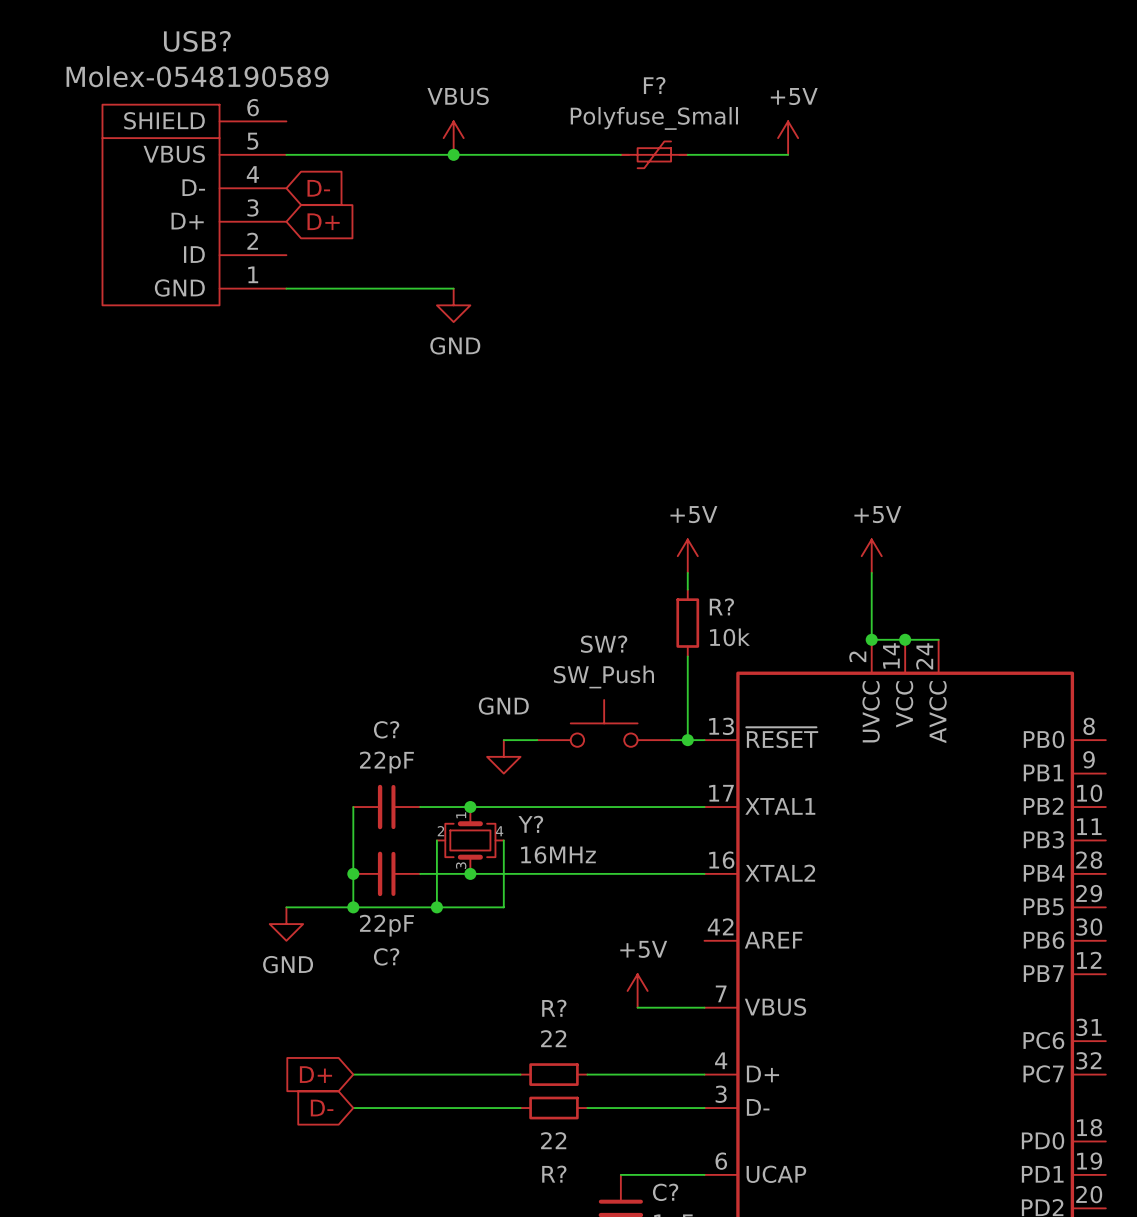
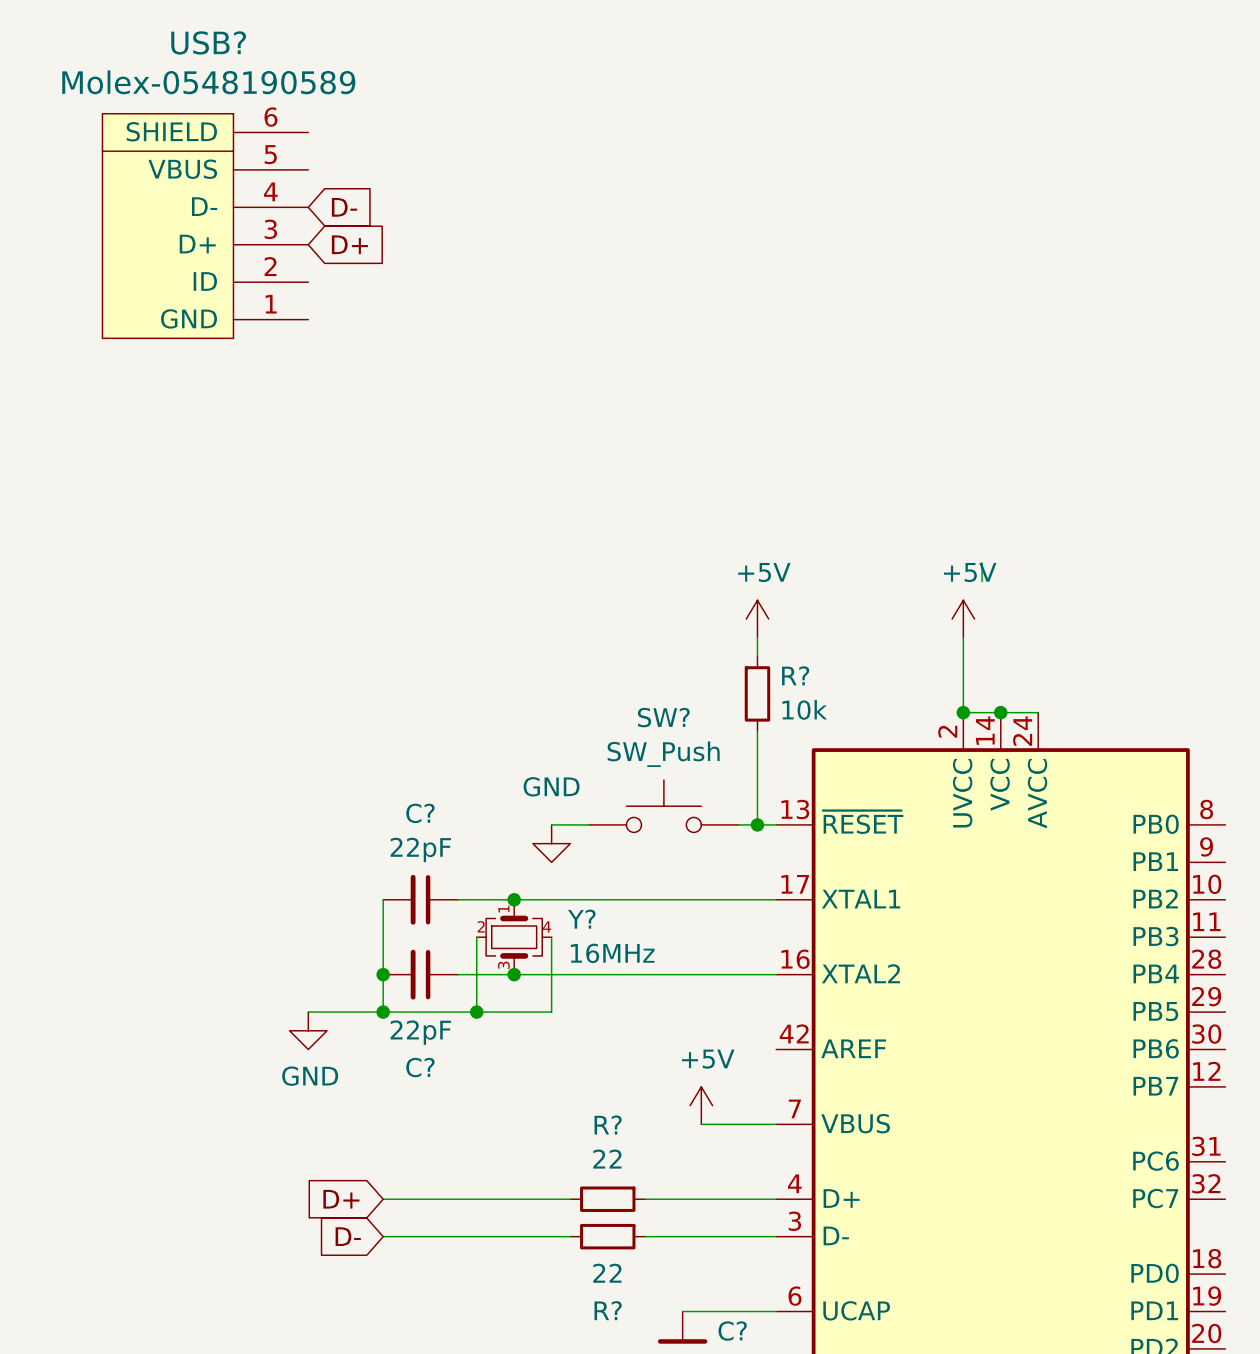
power symbol: VBUS (453, 138) -> none
power symbol: +5V (788, 138) -> none
wire: (286, 154) (620, 154) -> none
junction: (453, 154) -> none
F?: Polyfuse_Small (654, 154) -> none
wire: (687, 154) (788, 154) -> none
wire: (286, 288) (453, 288) -> none
power symbol: GND (453, 305) -> none
wire: none -> (982, 562) (982, 581)

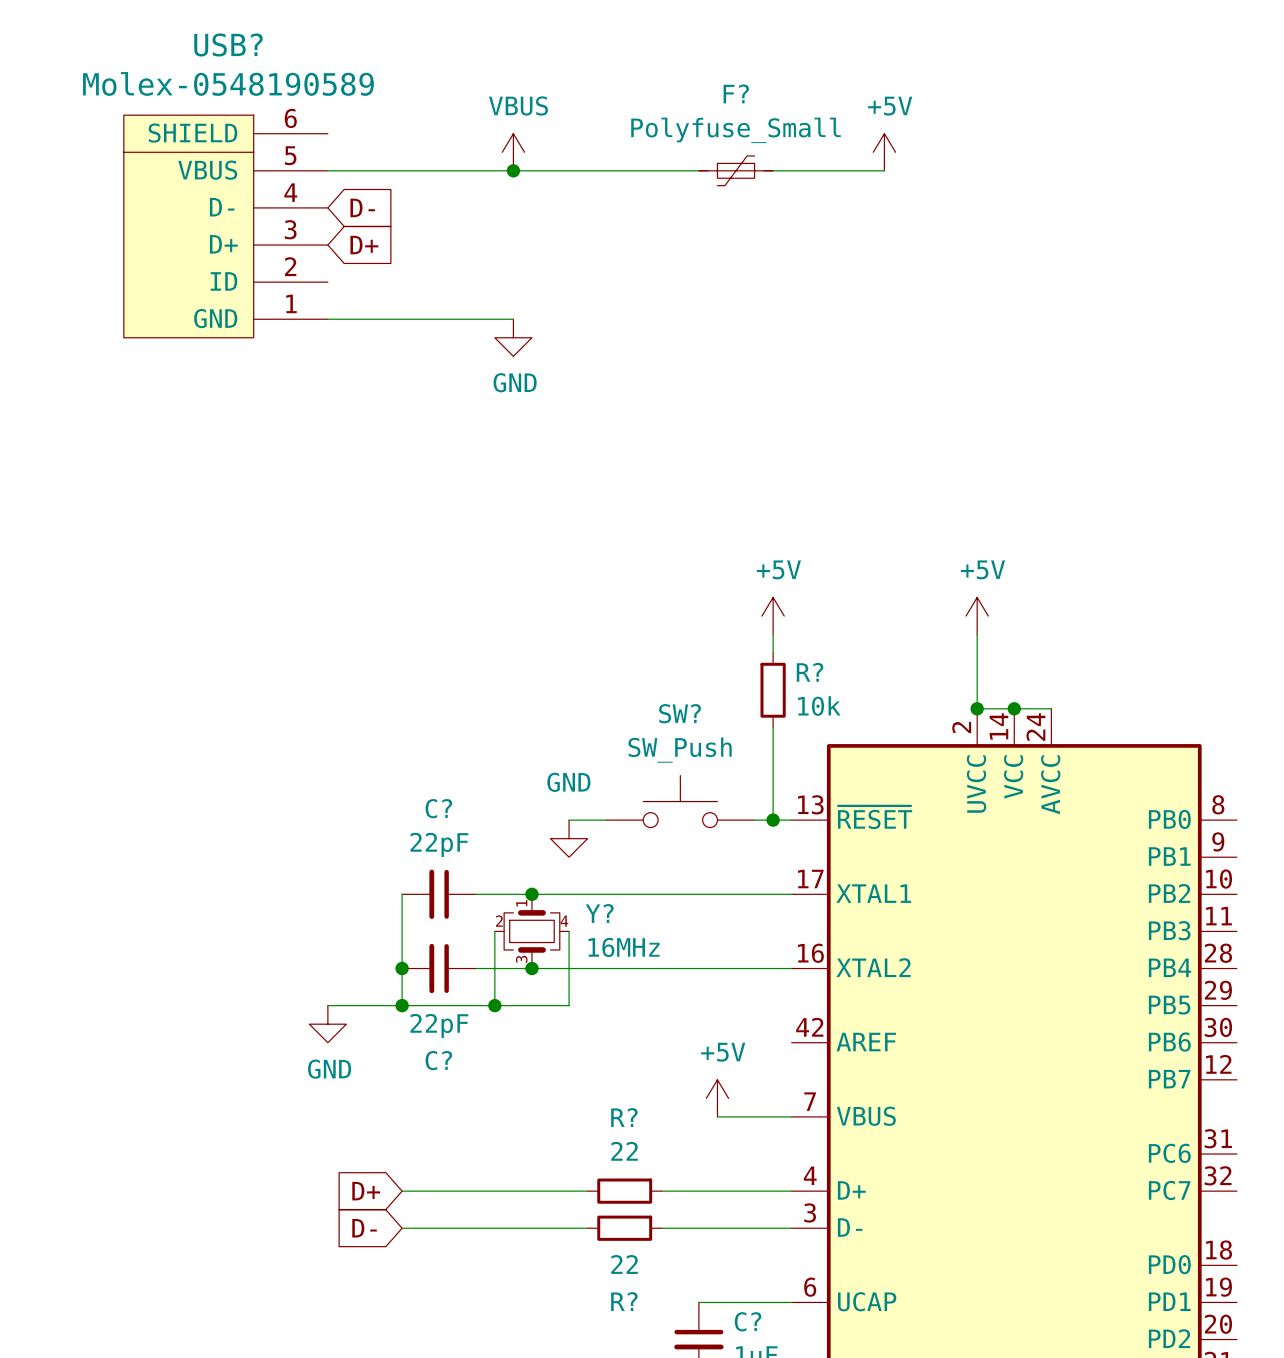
power symbol: none -> VBUS (513, 152)
power symbol: none -> +5V (884, 152)
wire: none -> (327, 170) (698, 170)
junction: none -> (513, 170)
F?: none -> Polyfuse_Small (736, 170)
wire: none -> (773, 170) (884, 170)
wire: none -> (327, 319) (513, 319)
power symbol: none -> GND (513, 337)
wire: (982, 562) (982, 581) -> none

